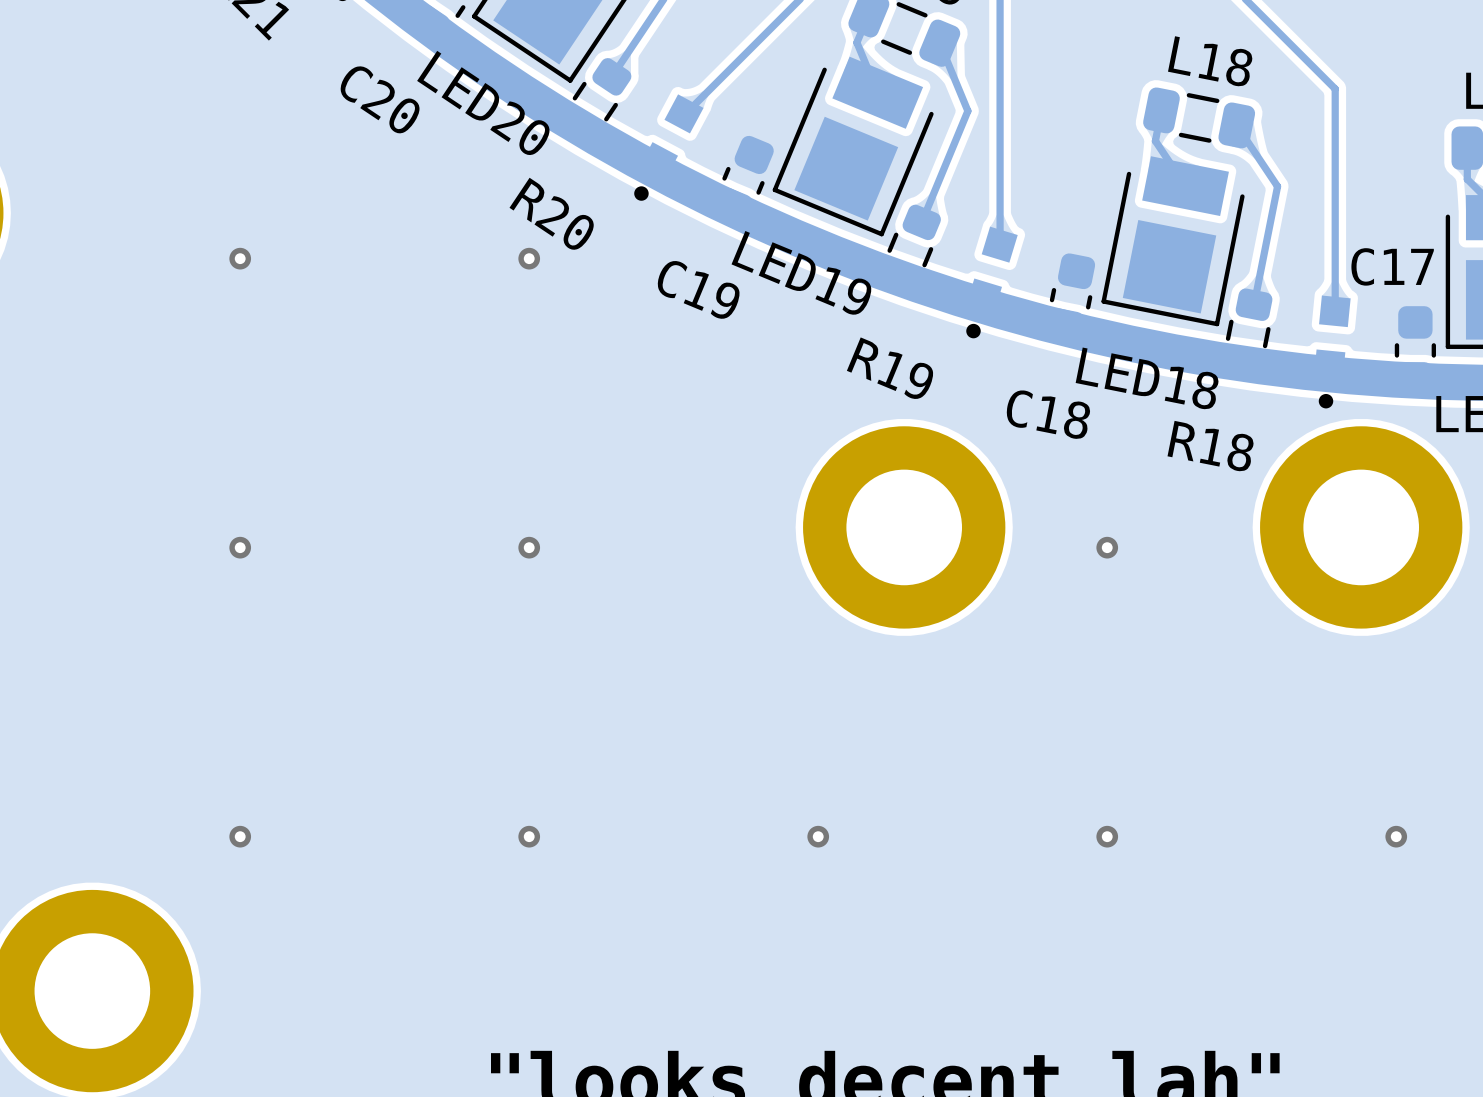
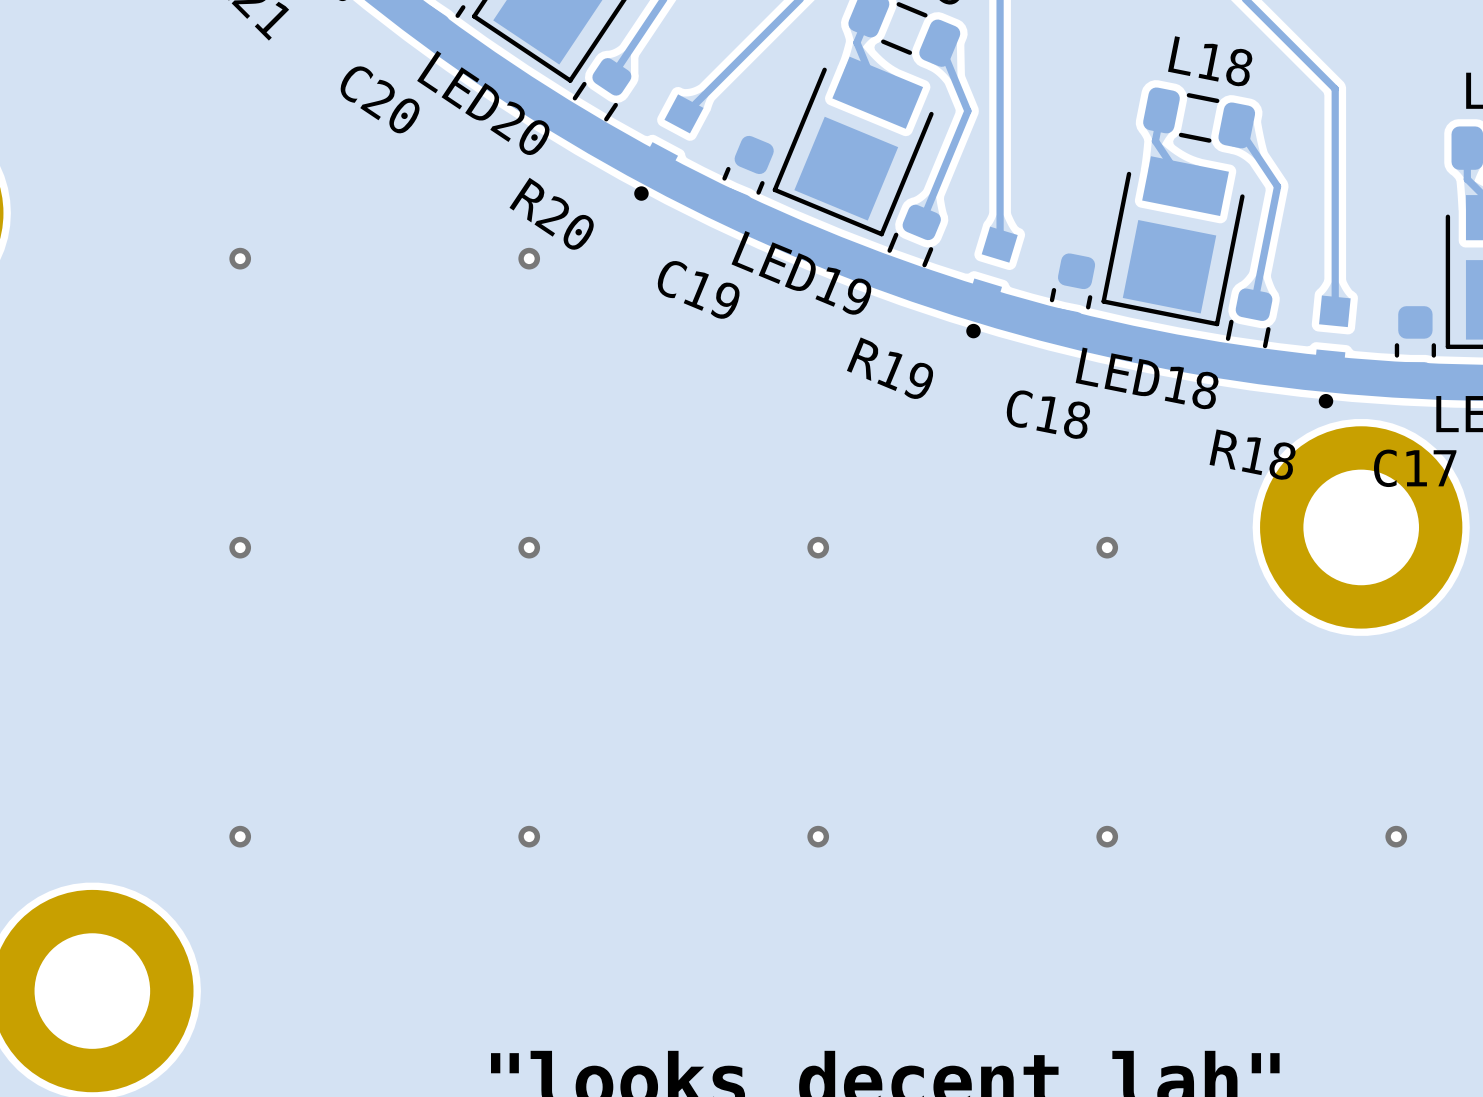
C17 name position: C17 (1392, 266) -> C17 (1415, 468)
R18 name position: R18 (1210, 446) -> R18 (1252, 454)
part: (904, 527) -> none
via: none -> (818, 547)

